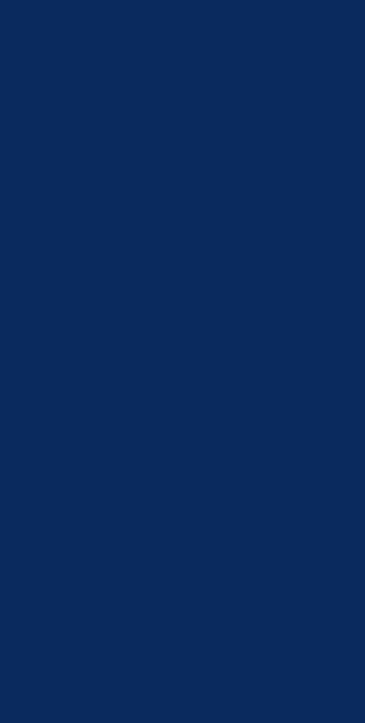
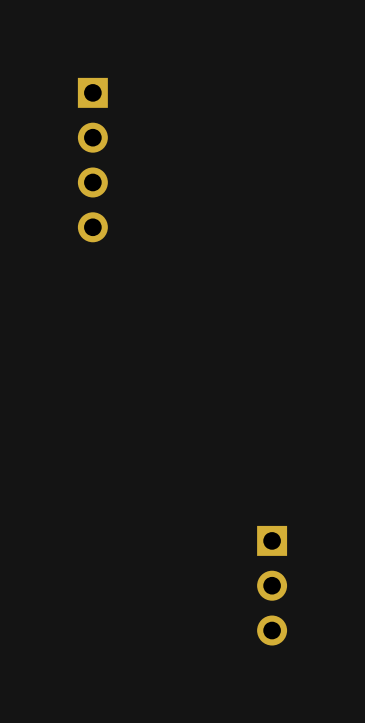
part: none -> (92, 160)
part: none -> (272, 585)

